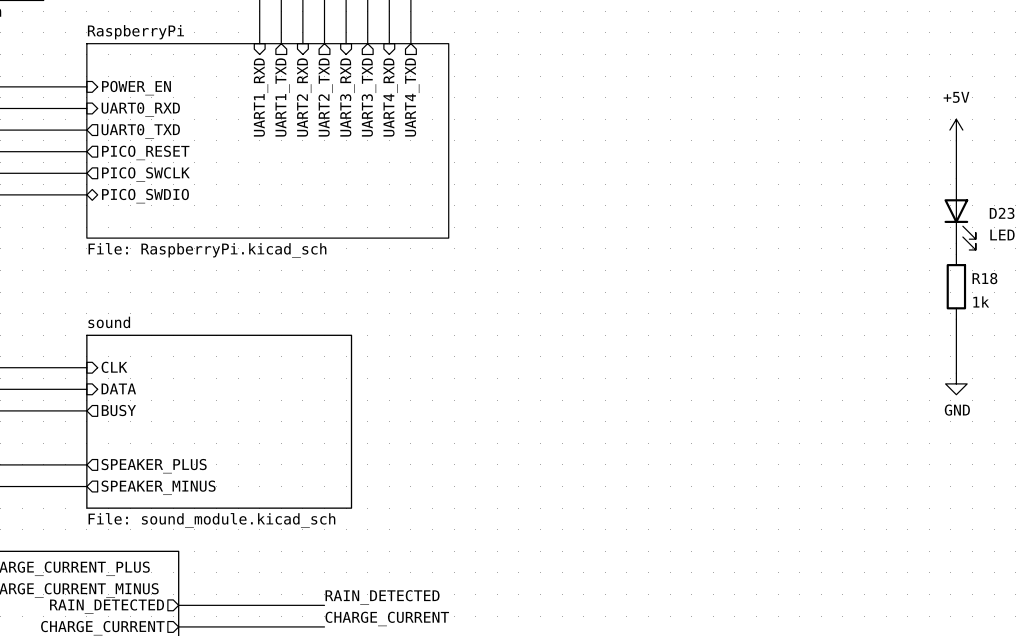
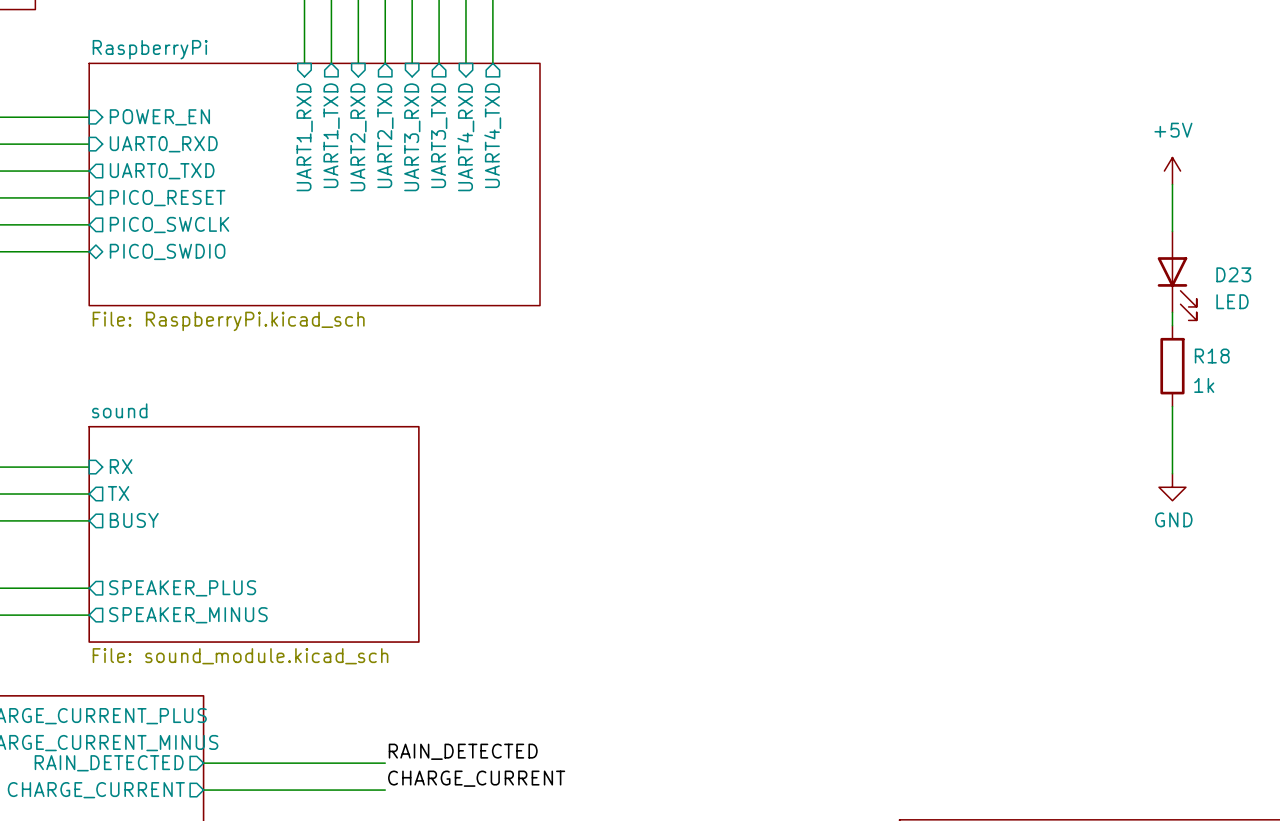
sheet pin: CLK (114, 367) -> RX (121, 466)
sheet pin shape: input (118, 388) -> output (118, 493)
sheet pin: DATA (118, 388) -> TX (118, 493)

